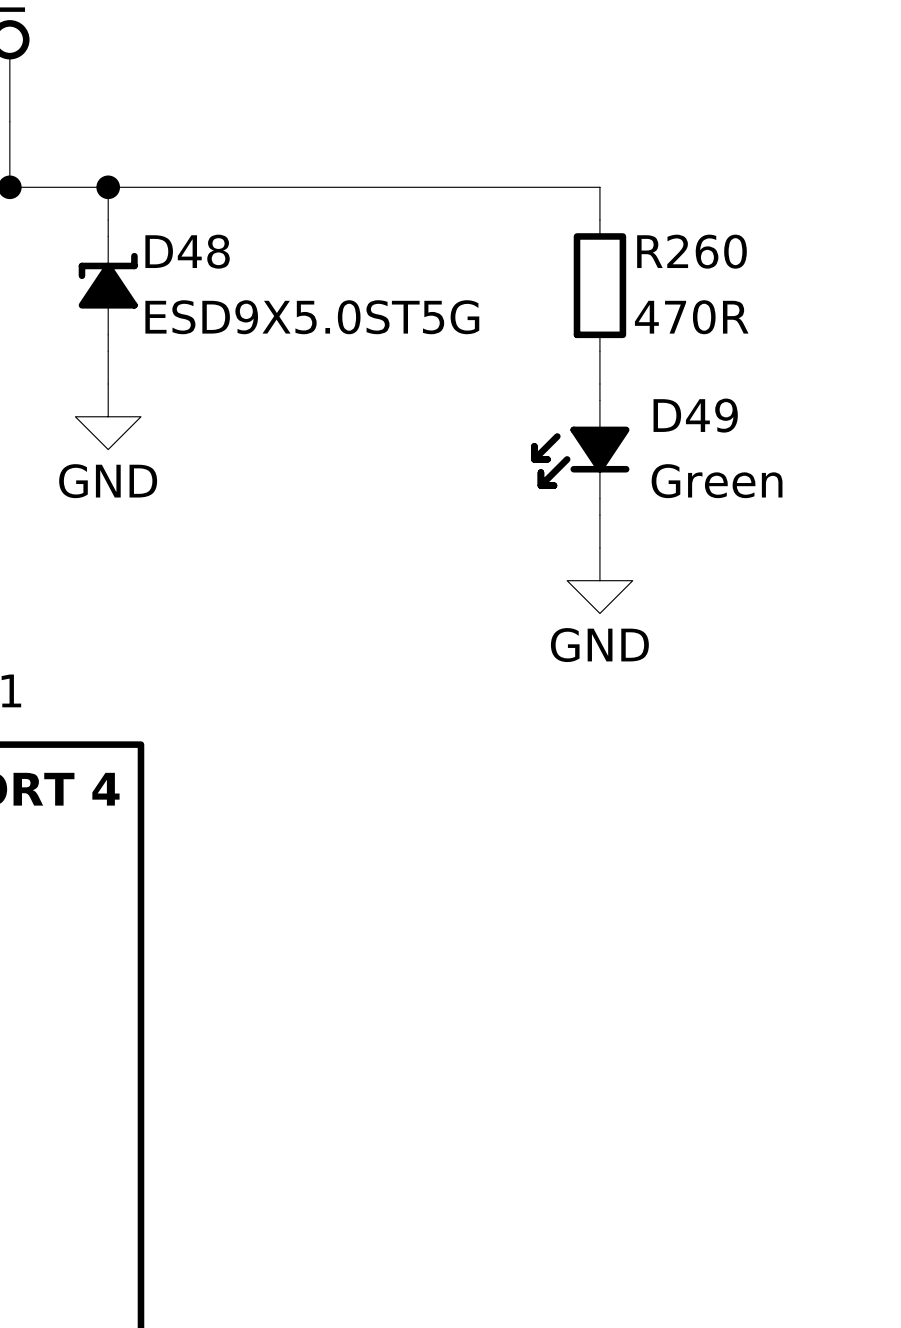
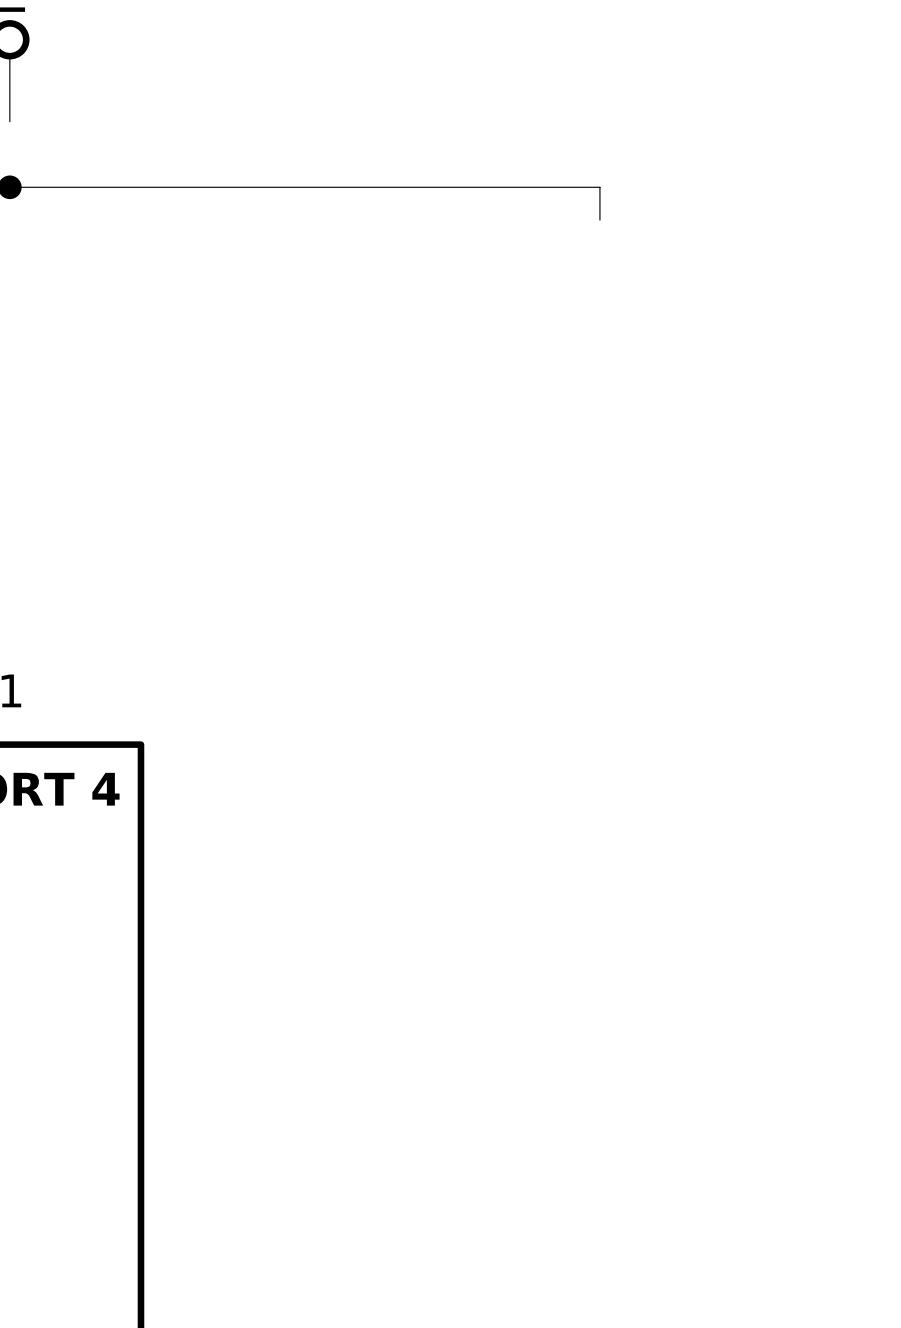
wire: (9, 121) (9, 187) -> none
wire: (108, 187) (108, 220) -> none
junction: (108, 187) -> none
D48: (108, 285) -> none
R260: (599, 285) -> none
wire: (108, 351) (108, 383) -> none
wire: (599, 351) (599, 383) -> none
power symbol: GND (108, 416) -> none
D49: (580, 449) -> none
wire: (599, 515) (599, 547) -> none
power symbol: GND (599, 580) -> none

